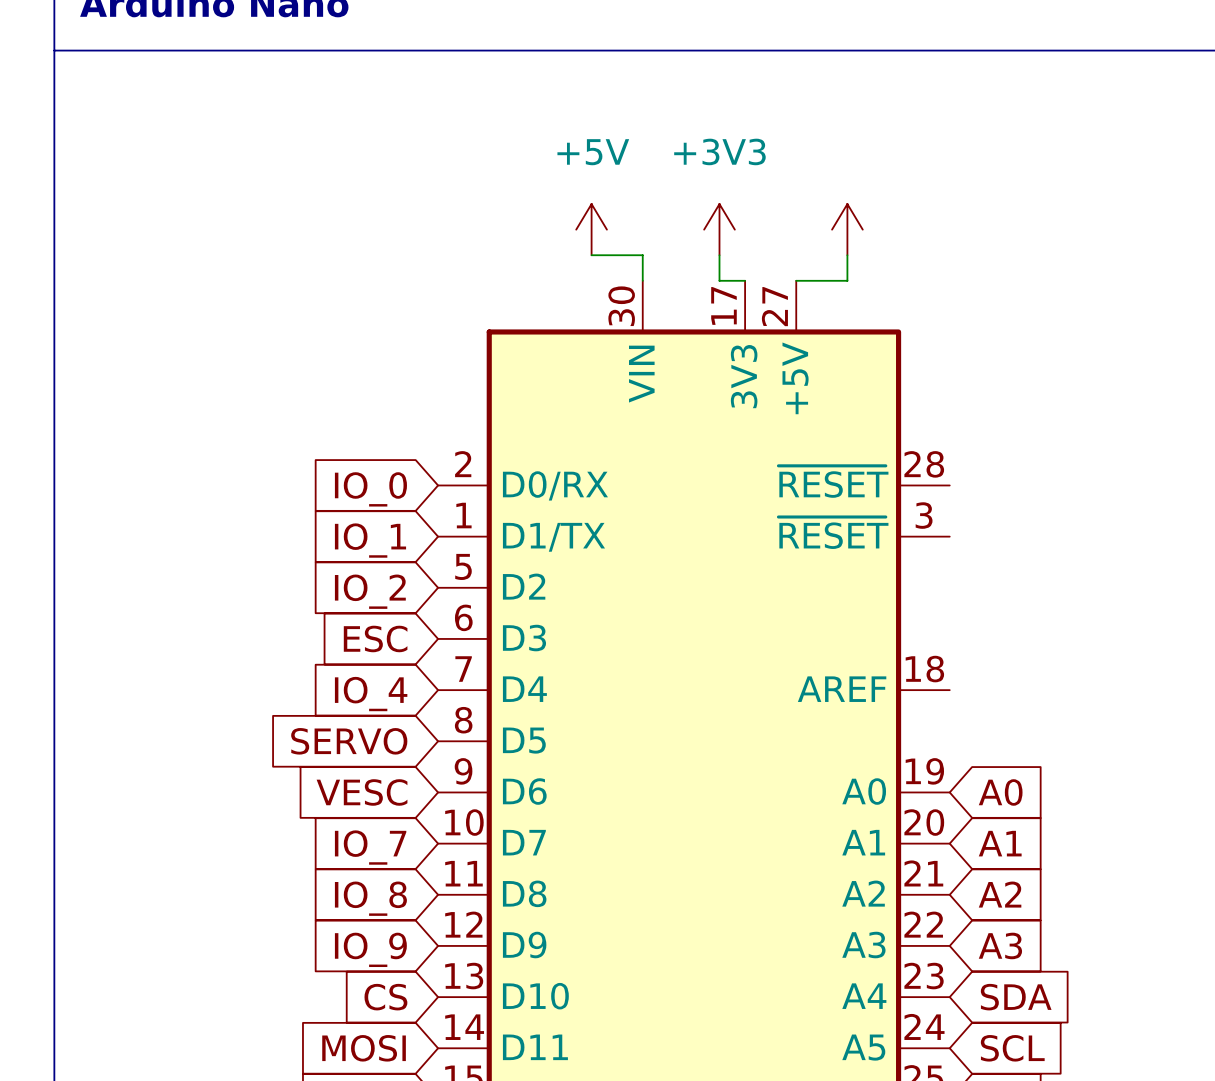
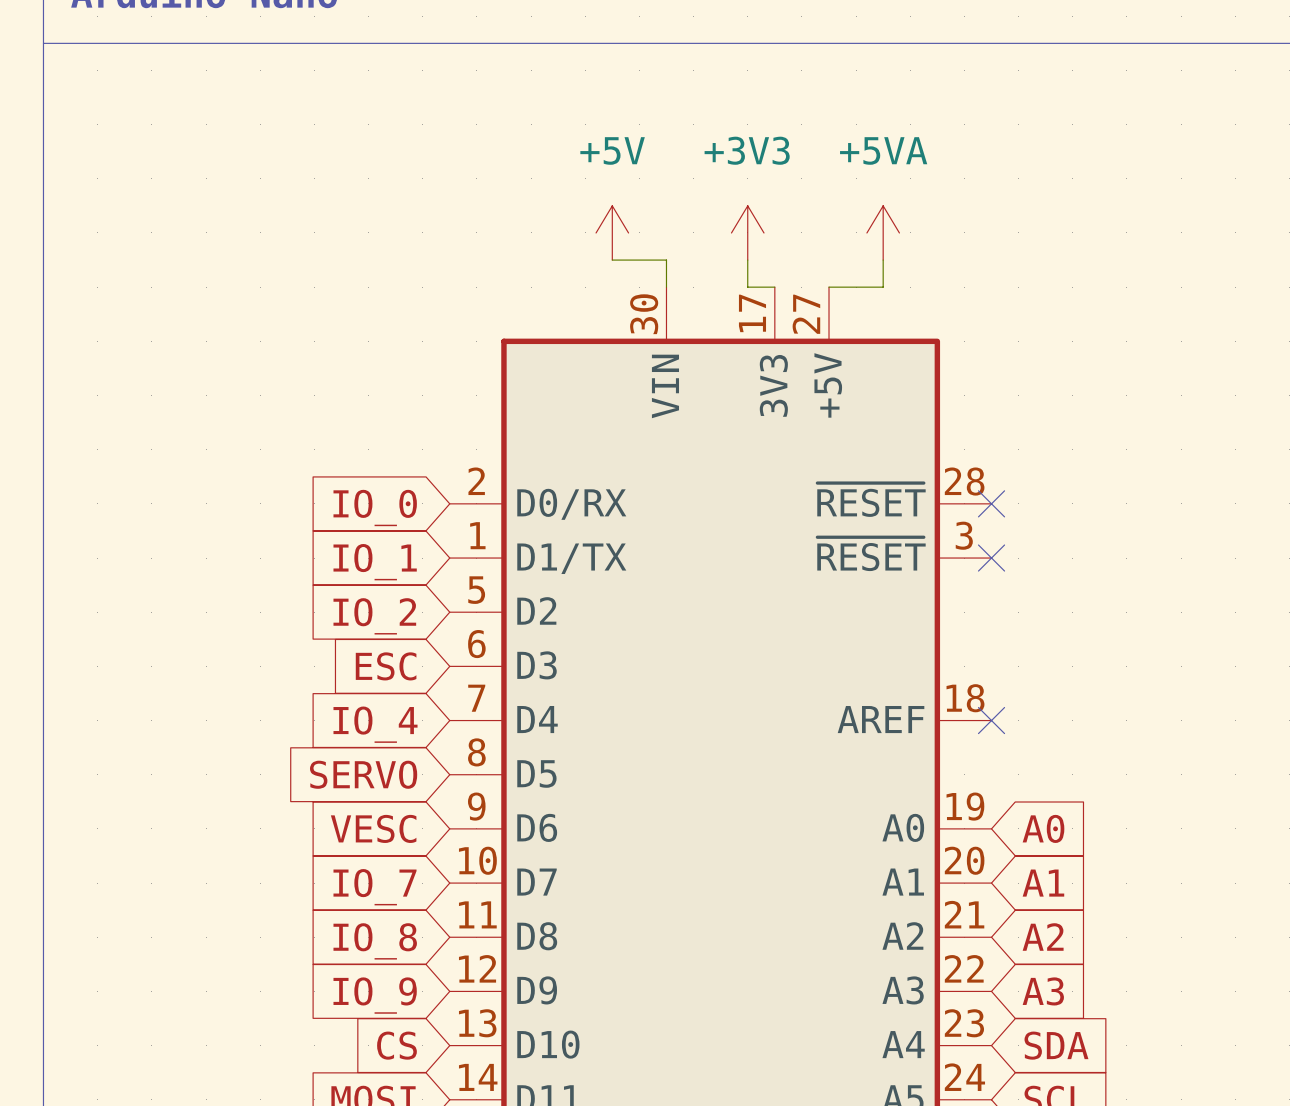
power symbol text: none -> +5VA (883, 150)
no-connect mark: none -> (991, 503)
no-connect mark: none -> (991, 558)
no-connect mark: none -> (991, 720)

